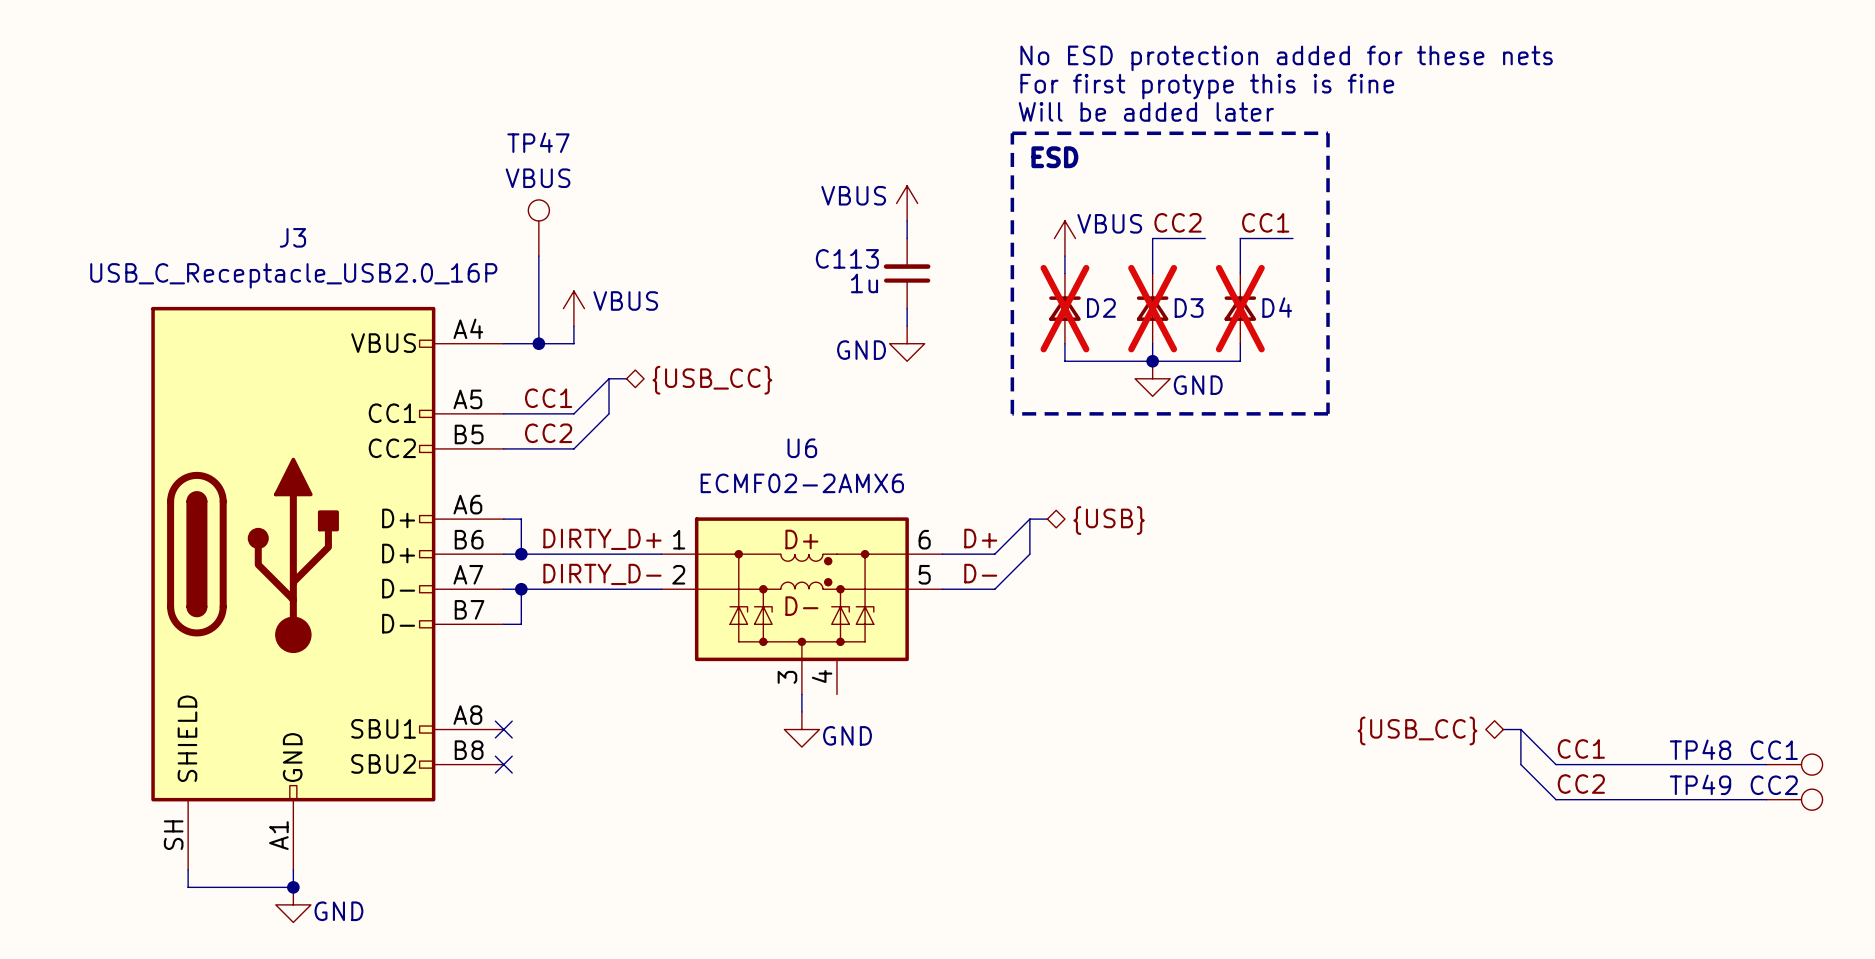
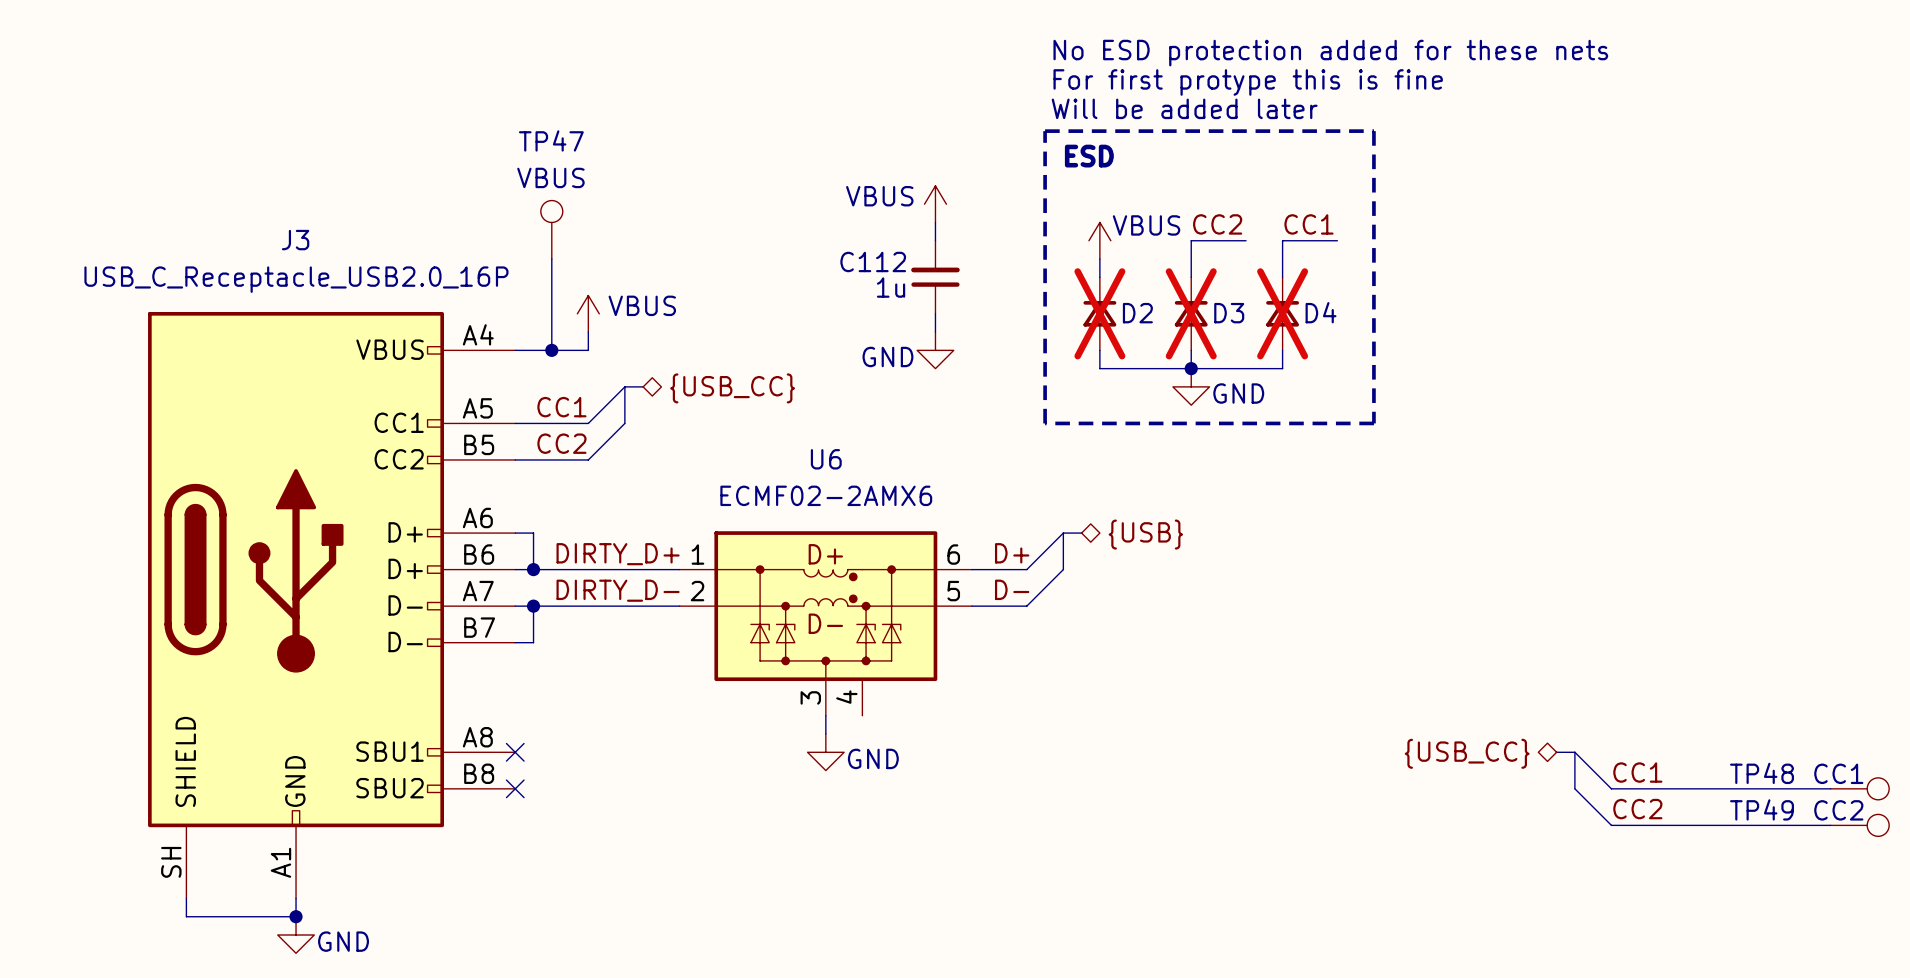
C113 name: C113 (847, 258) -> C112 (873, 261)

